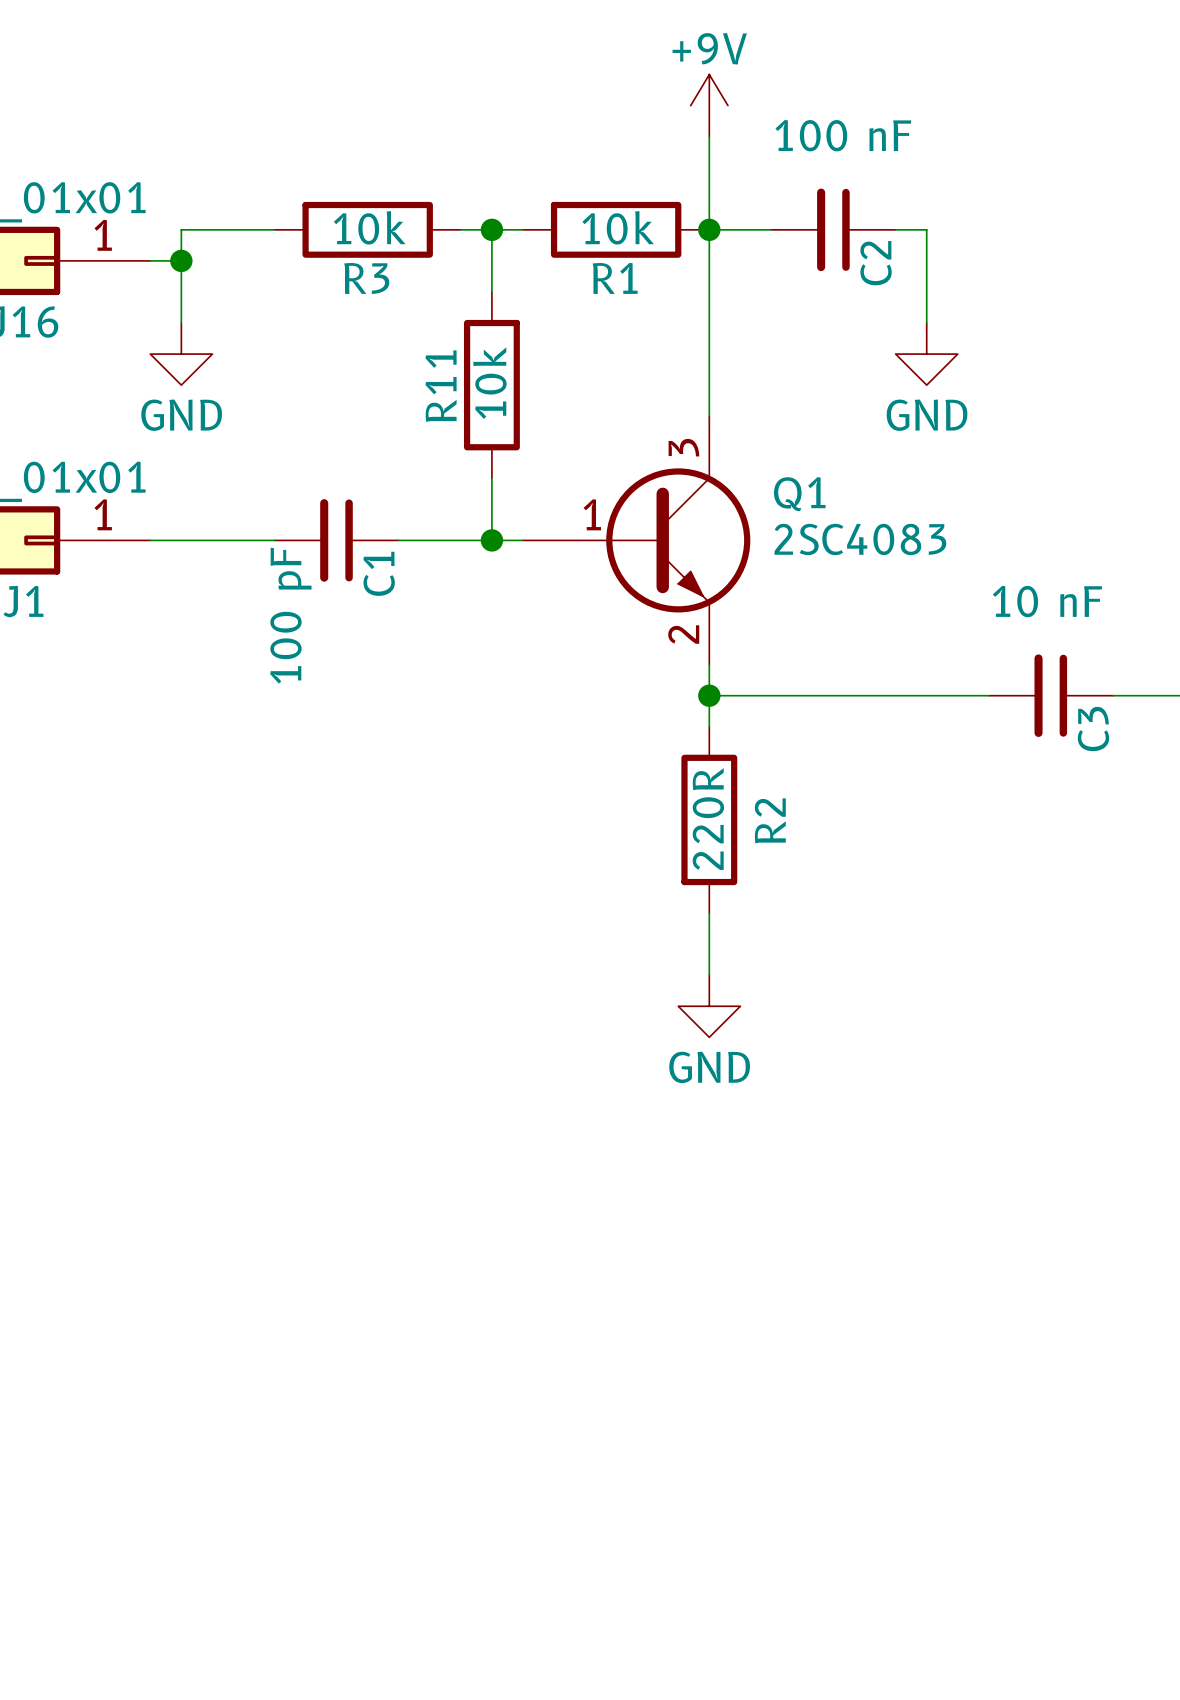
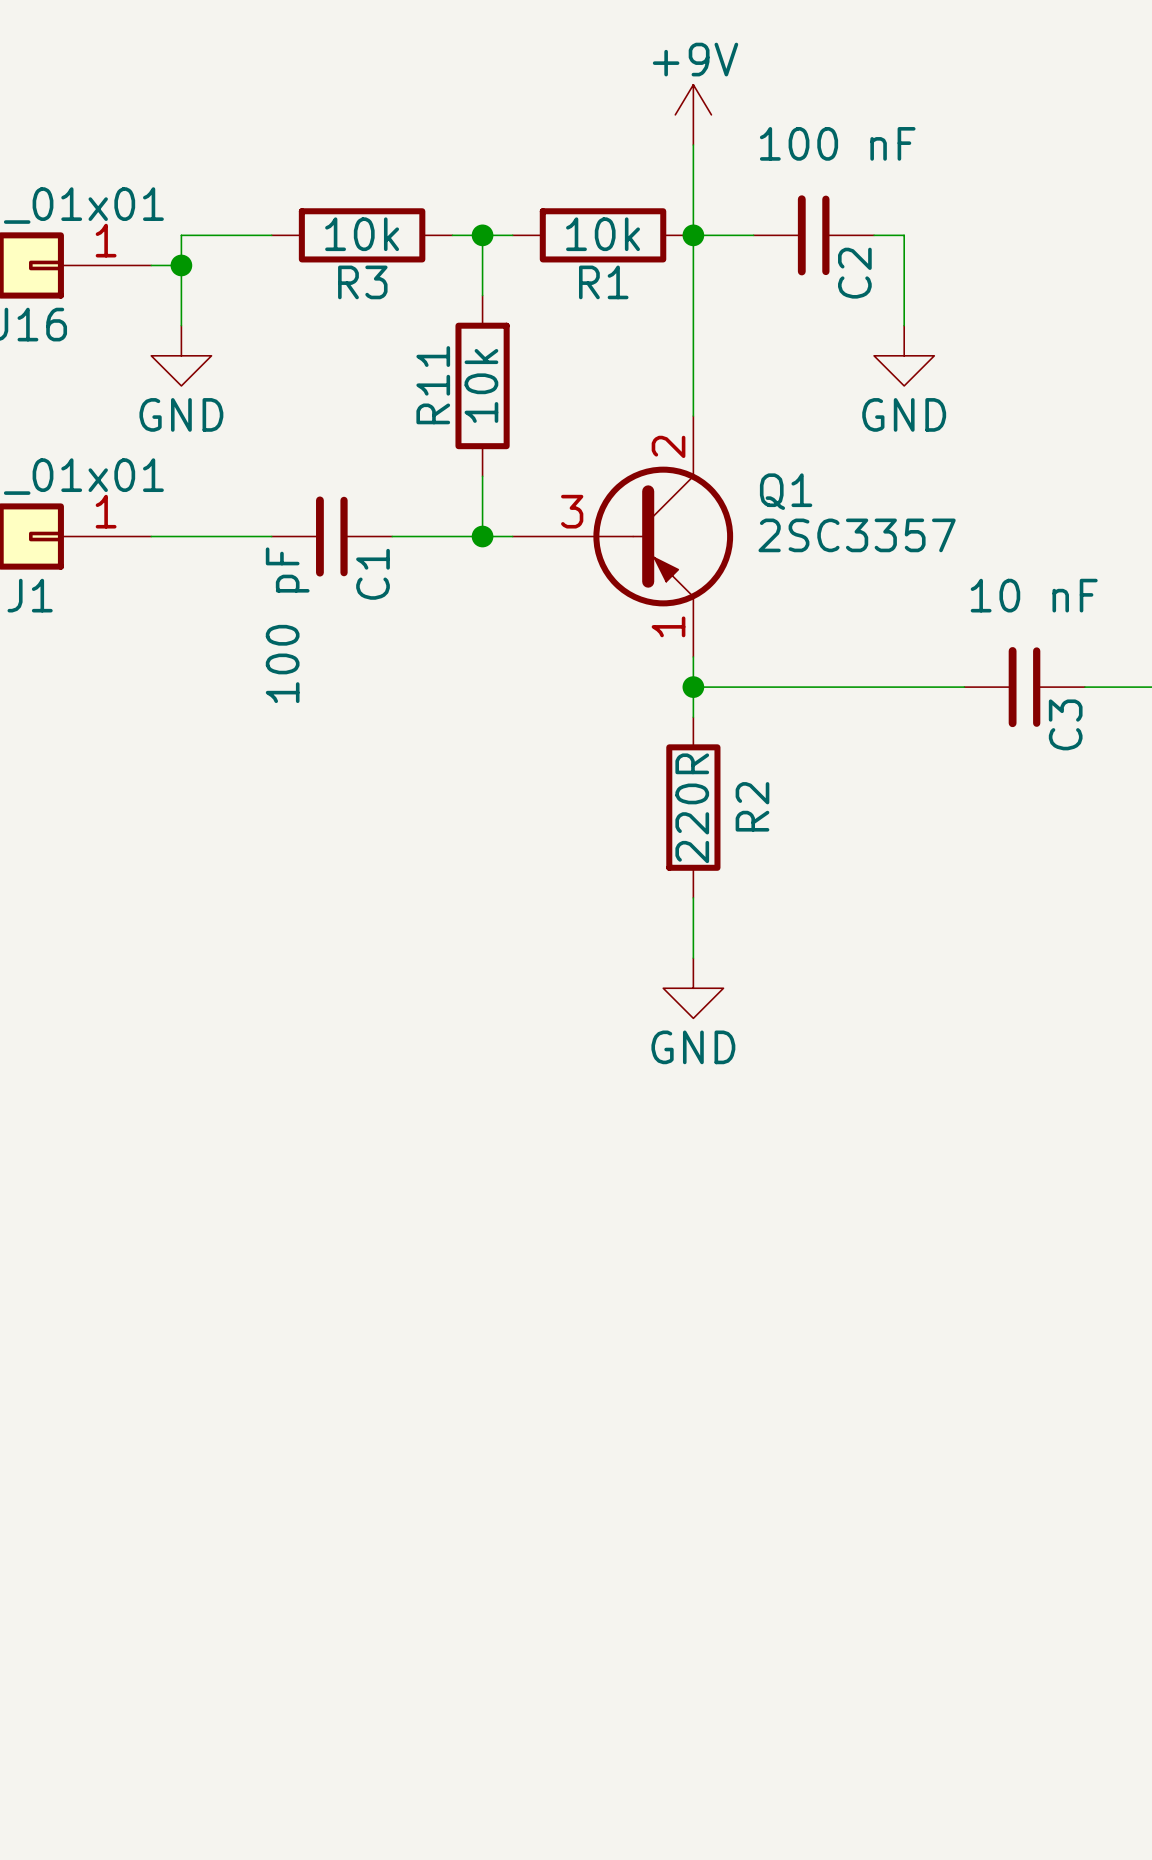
Q1 symbol: [522, 416, 751, 665] -> [512, 416, 734, 657]
Q1 value: 2SC4083 (860, 539) -> 2SC3357 (857, 535)

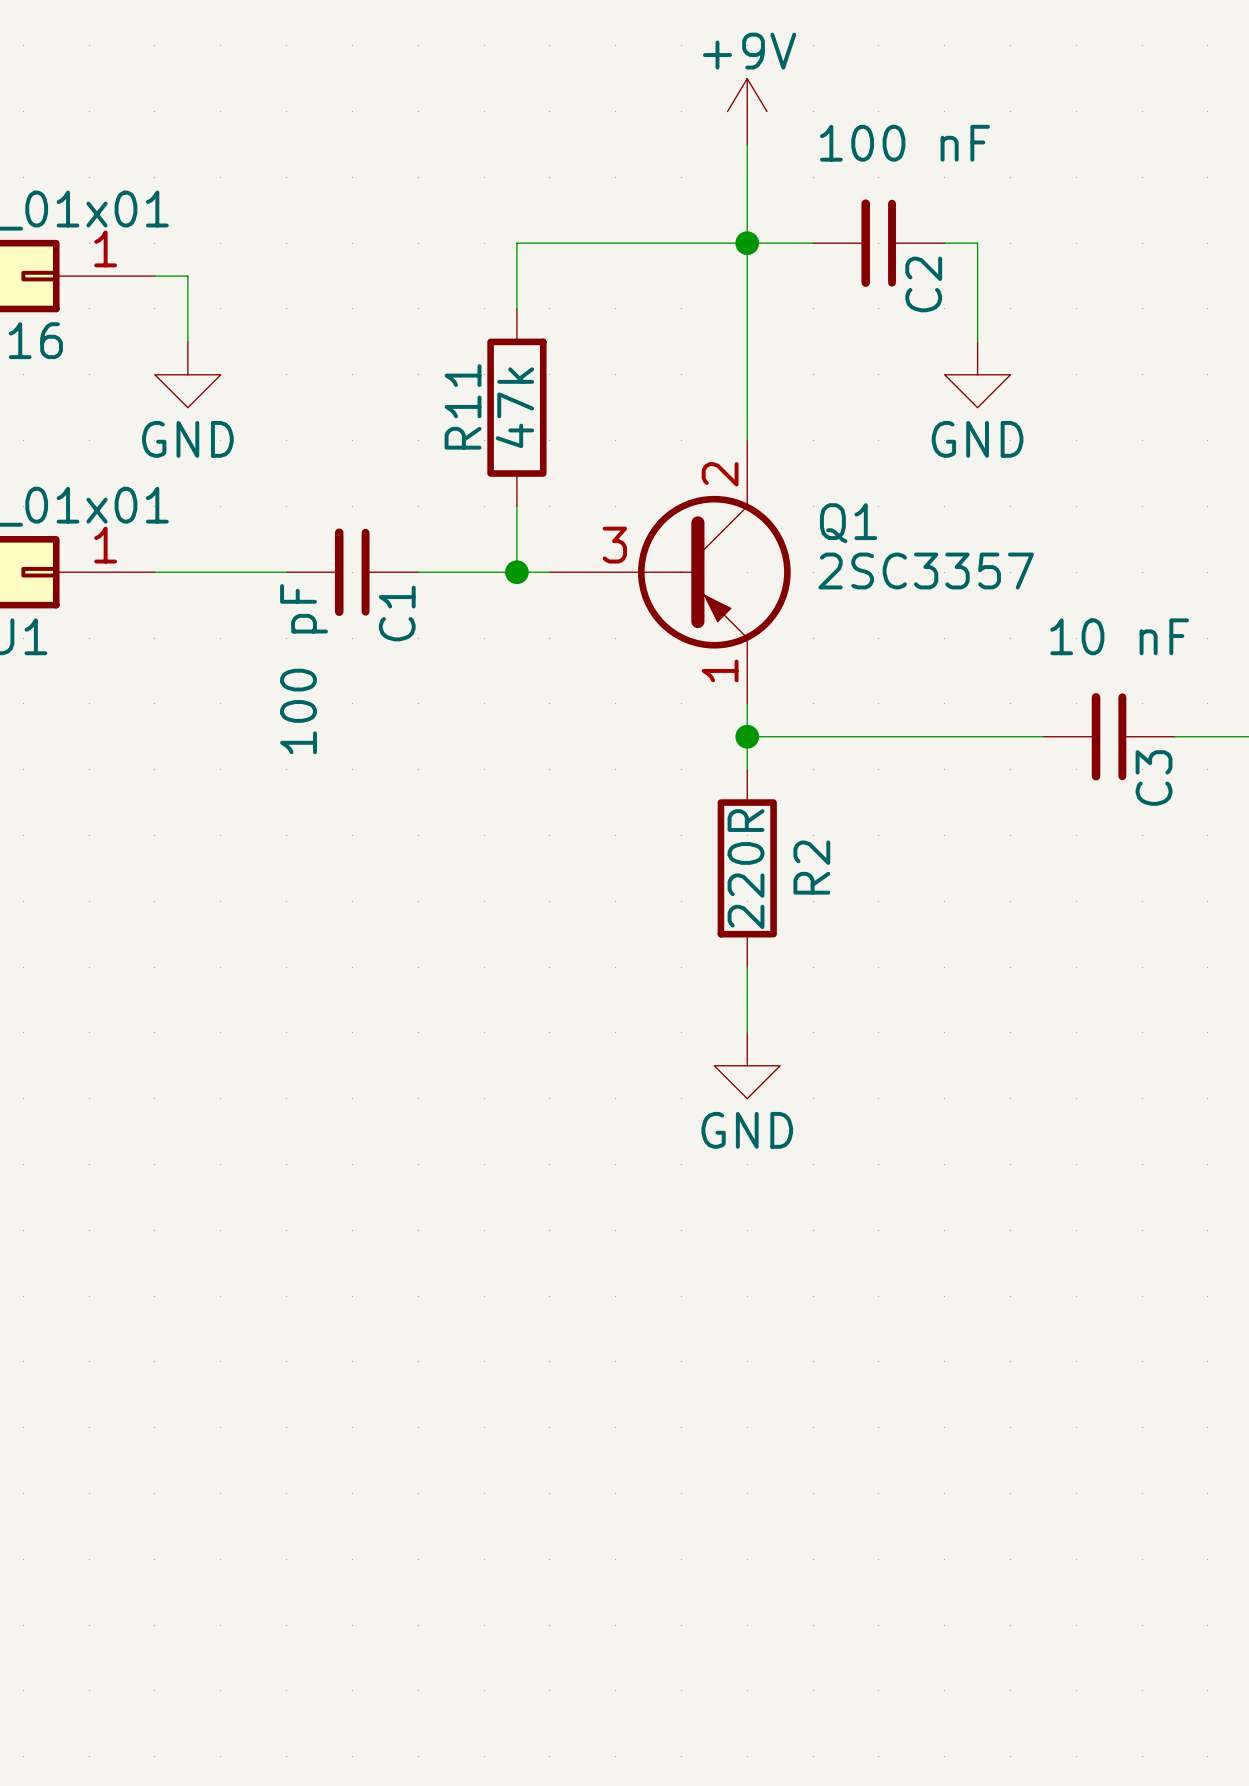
wire: (271, 235) (181, 235) (181, 265) -> none
R3: 10k (362, 235) -> none
wire: (452, 235) (482, 235) -> none
junction: (482, 235) -> none
wire: none -> (549, 243) (747, 243)
R1: 10k (603, 235) -> none
junction: (181, 265) -> none
R11 value: 10k (481, 385) -> 47k (514, 407)

